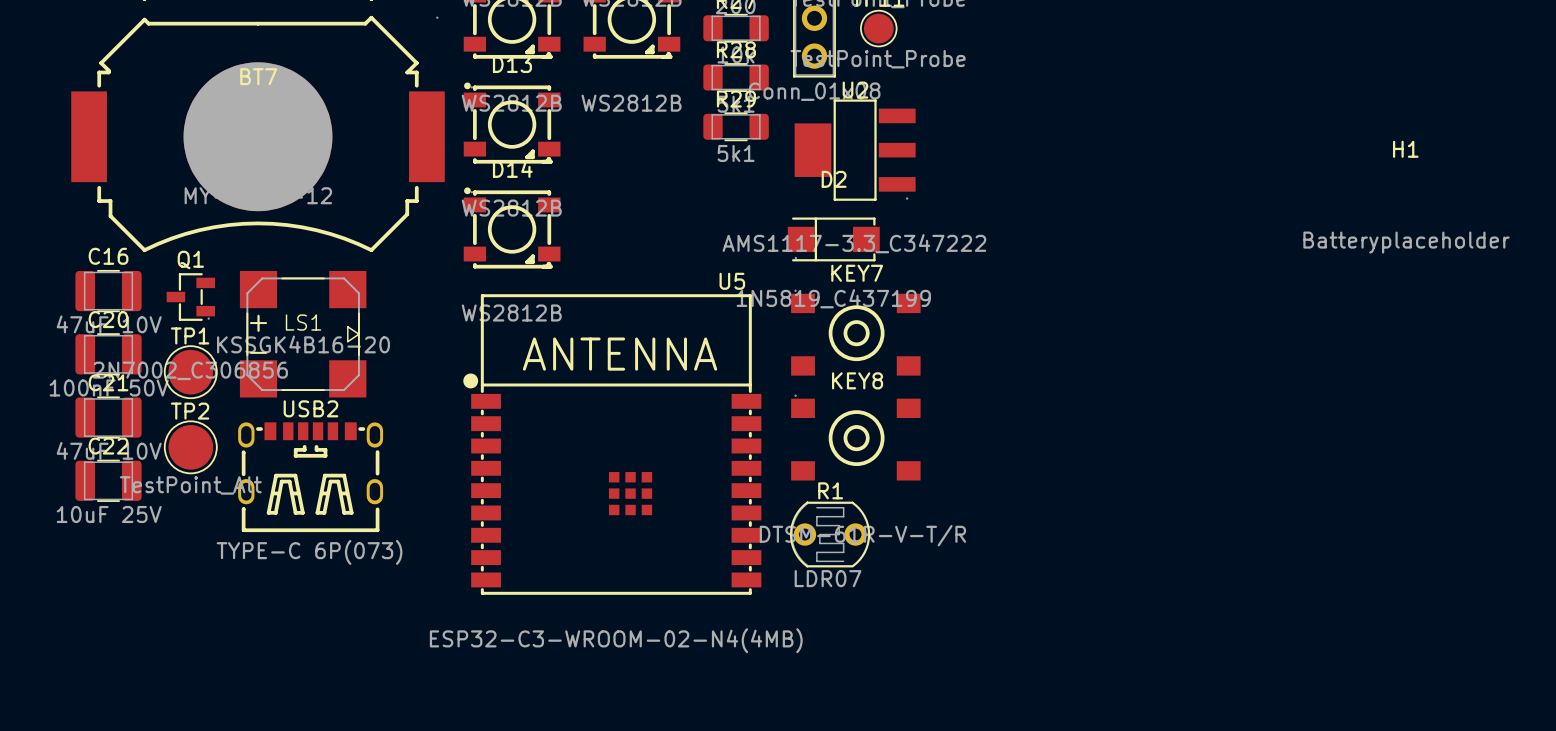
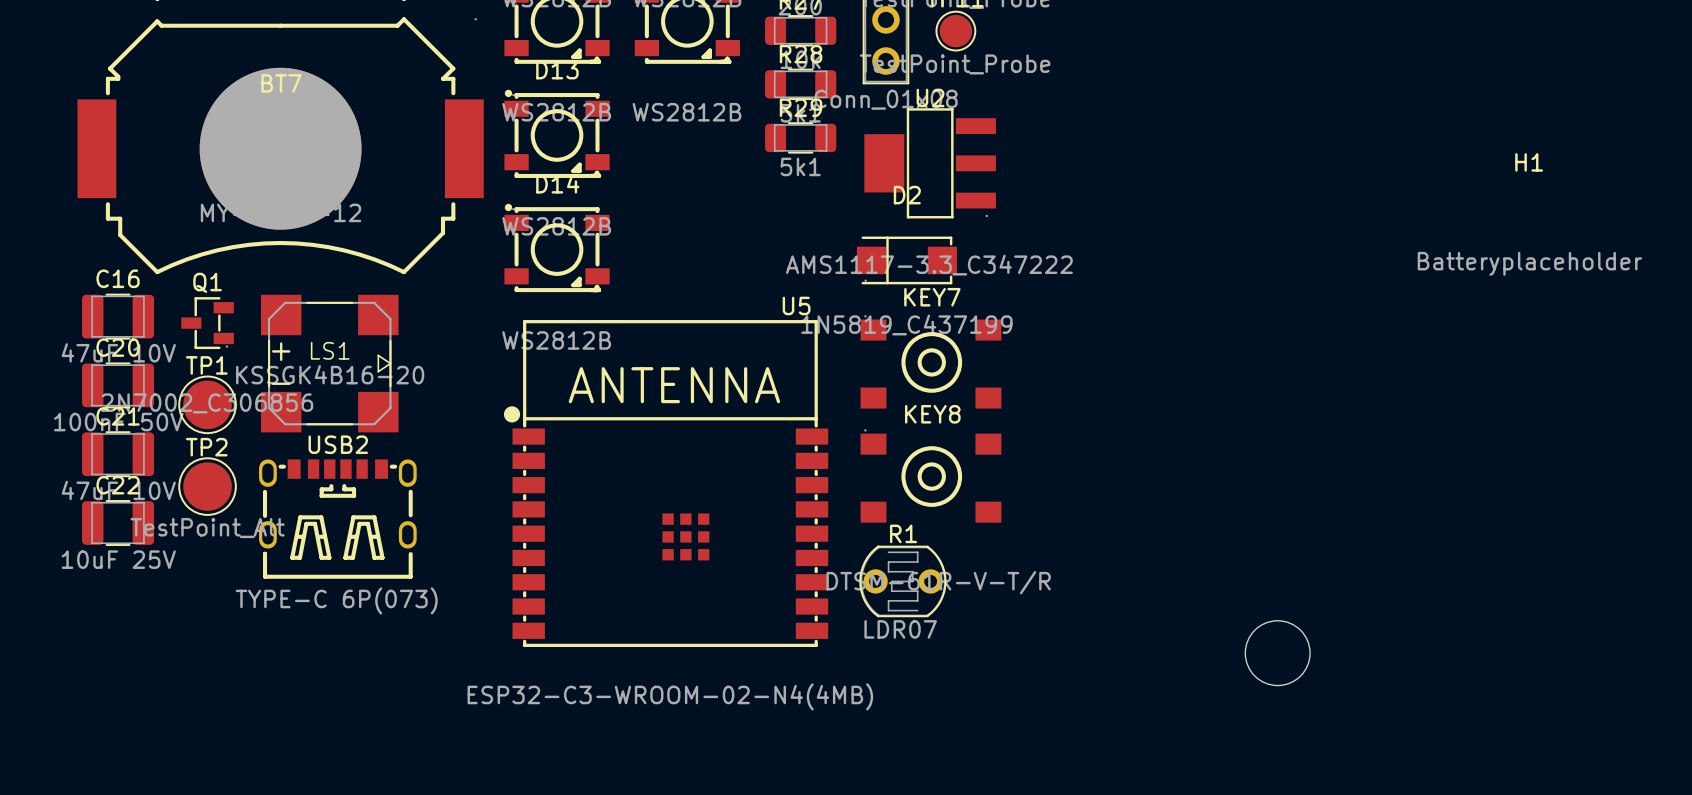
round board edge: none -> [1244, 620, 1311, 686]

